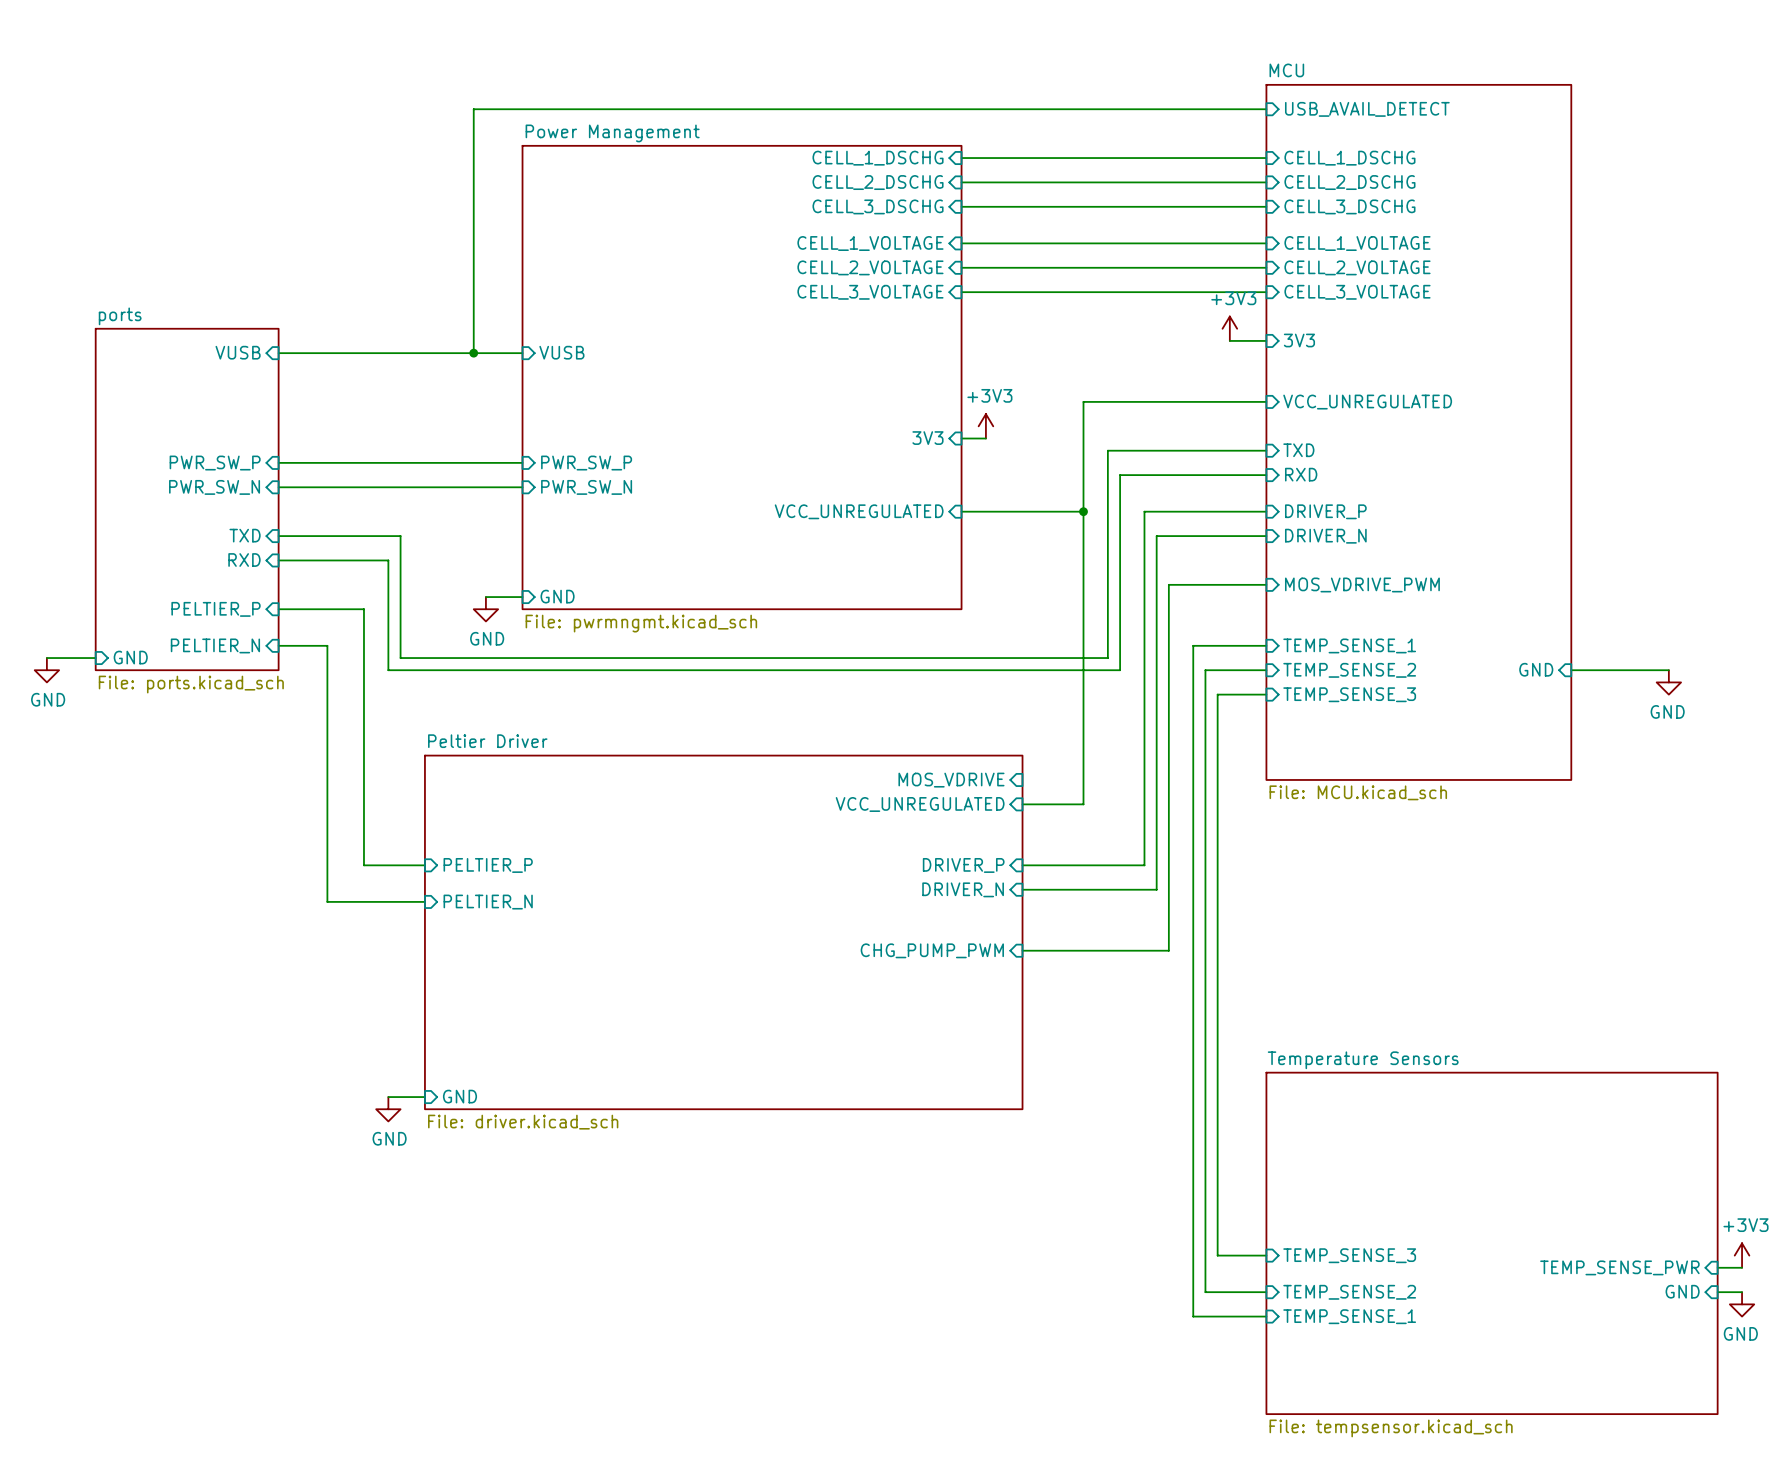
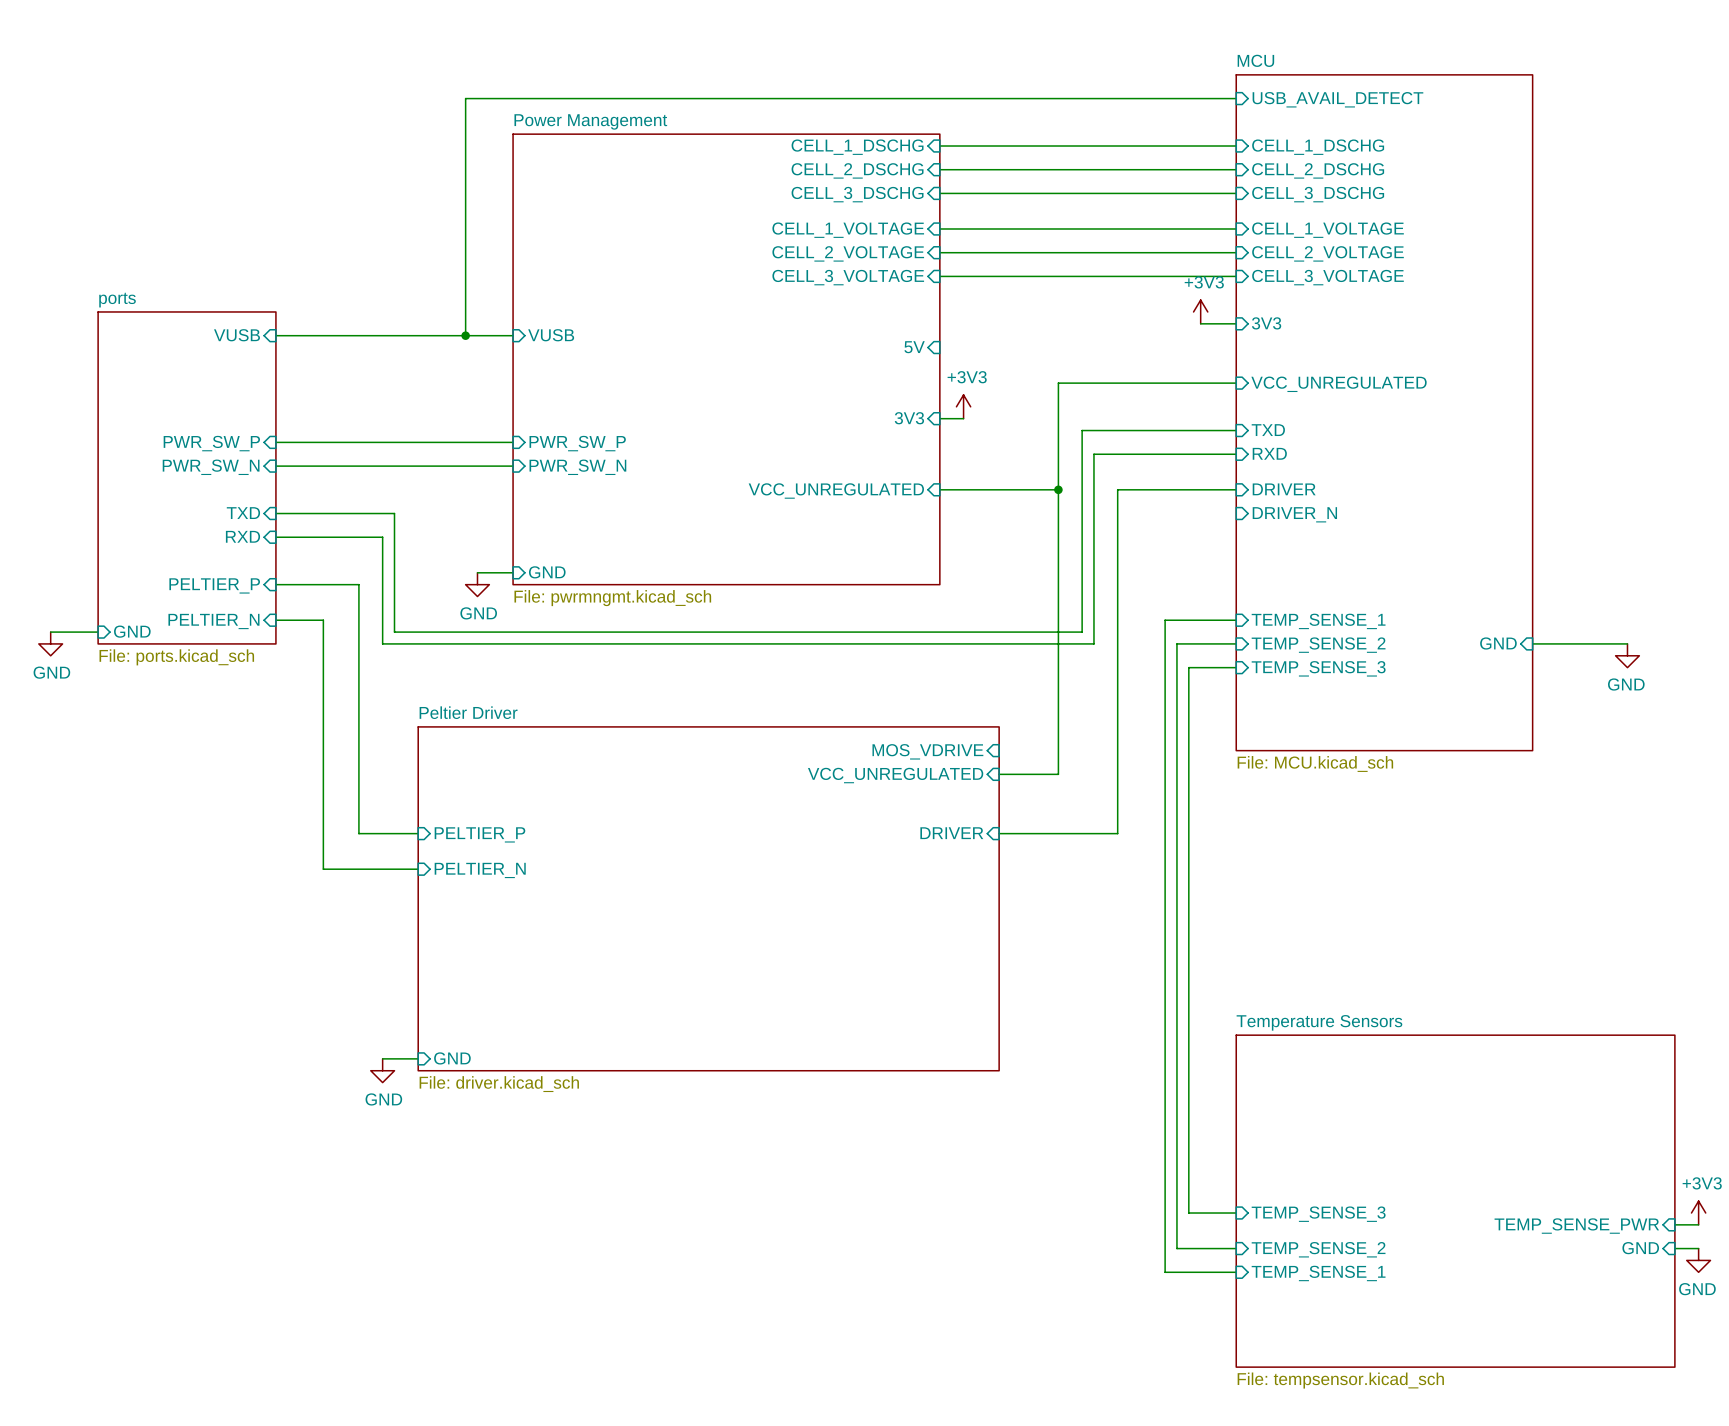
sheet pin: none -> 5V (914, 347)
sheet pin: DRIVER_P (1325, 511) -> DRIVER (1284, 489)
wire: (1266, 536) (1156, 536) (1156, 889) (1022, 889) -> none
wire: (1266, 584) (1168, 584) (1168, 950) (1022, 950) -> none
sheet pin: MOS_VDRIVE_PWM (1362, 584) -> none
sheet pin: DRIVER_P (963, 865) -> DRIVER (951, 833)
sheet pin: DRIVER_N (963, 889) -> none
sheet pin: CHG_PUMP_PWM (932, 950) -> none

